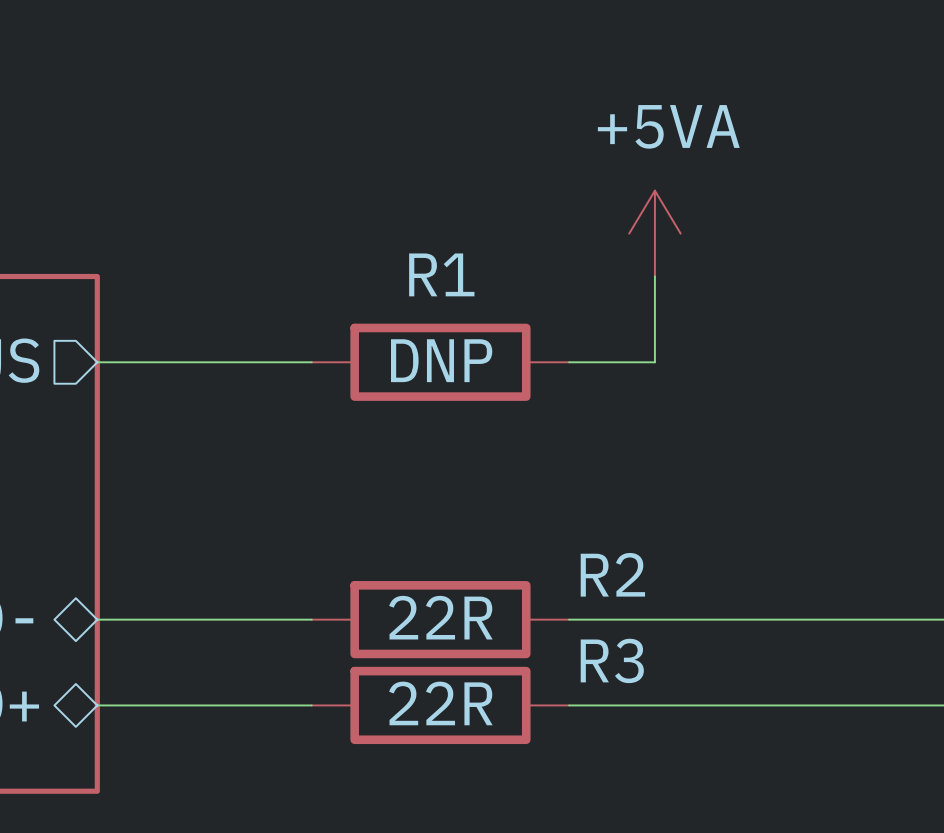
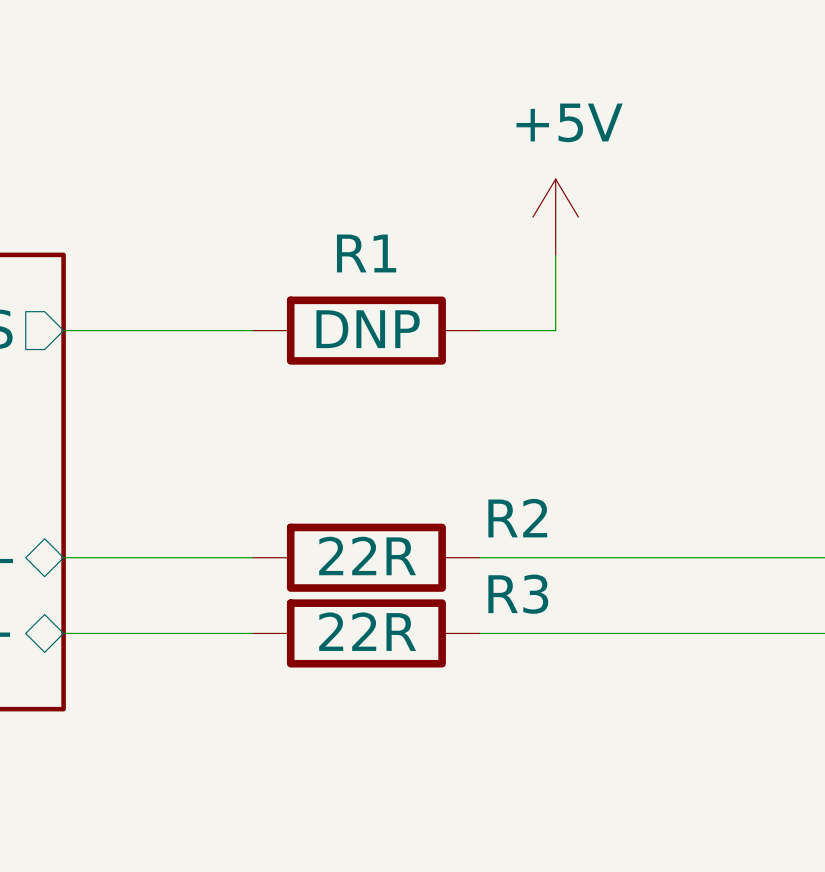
power symbol: +5VA (654, 233) -> +5V (555, 217)

